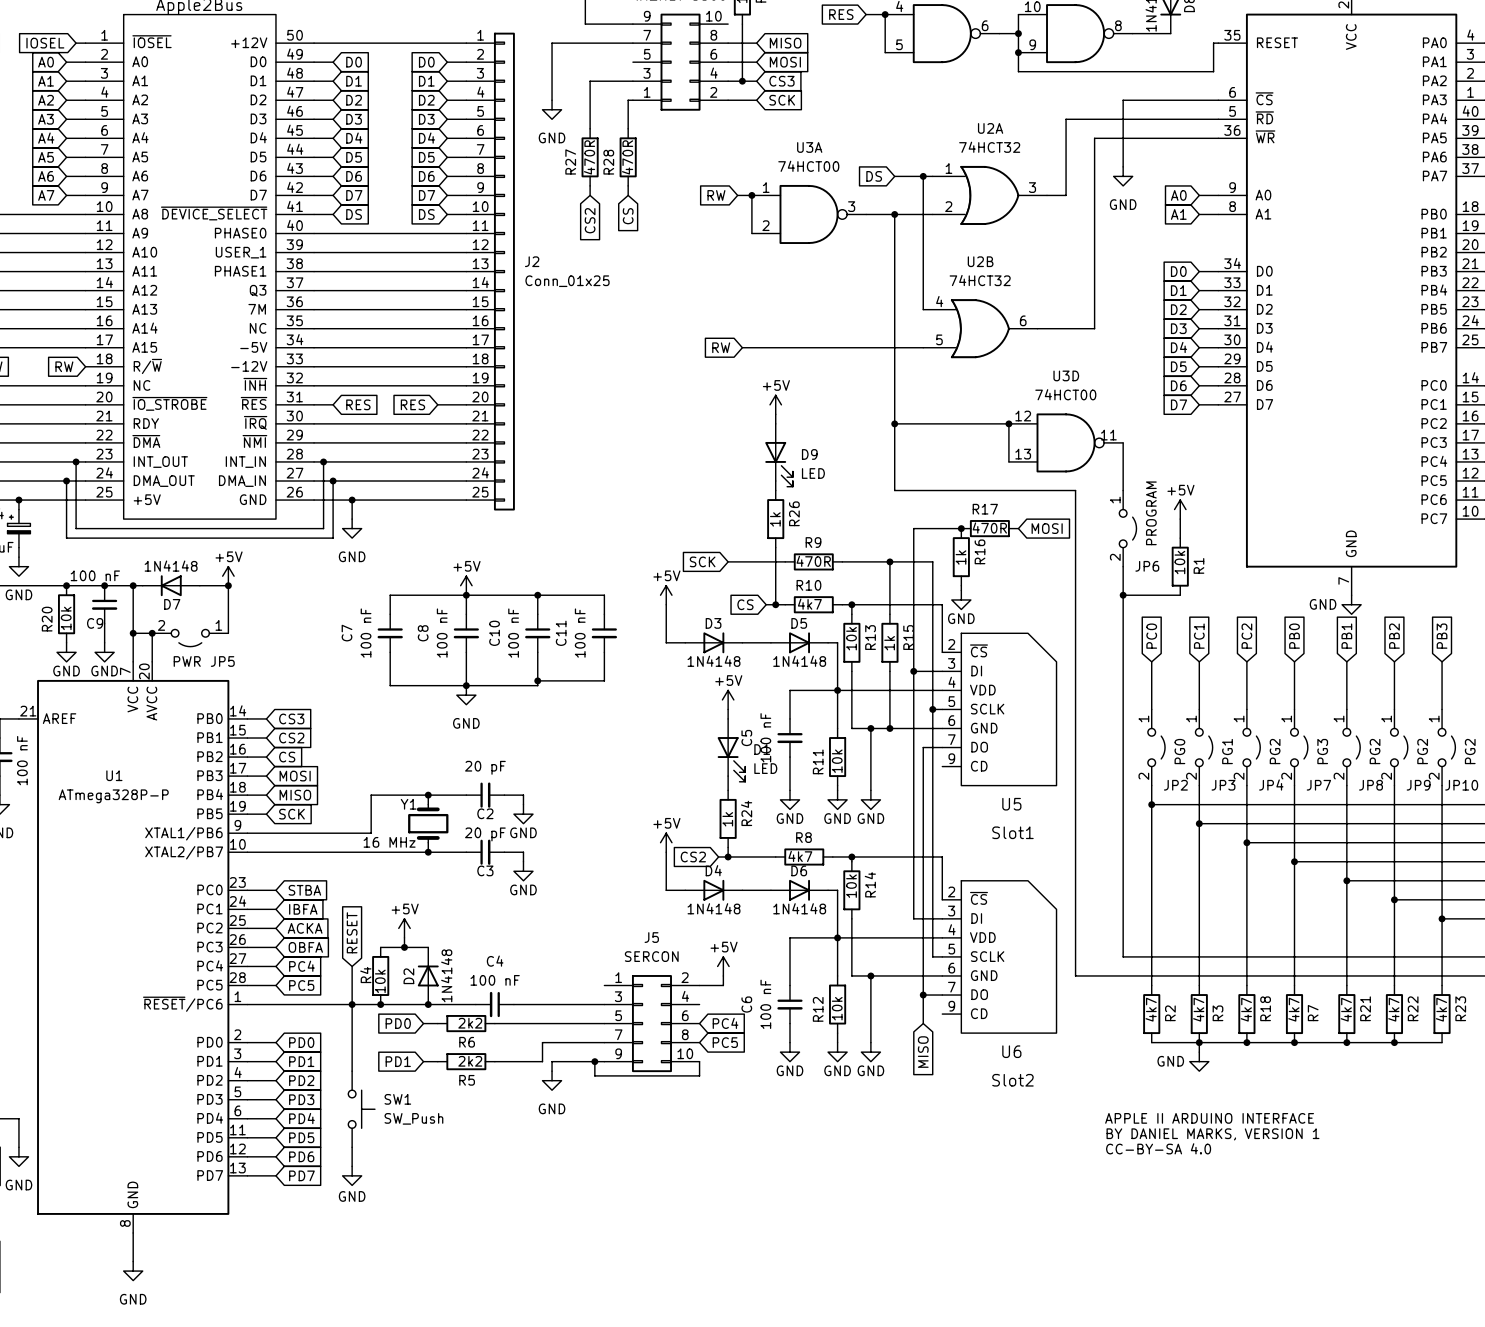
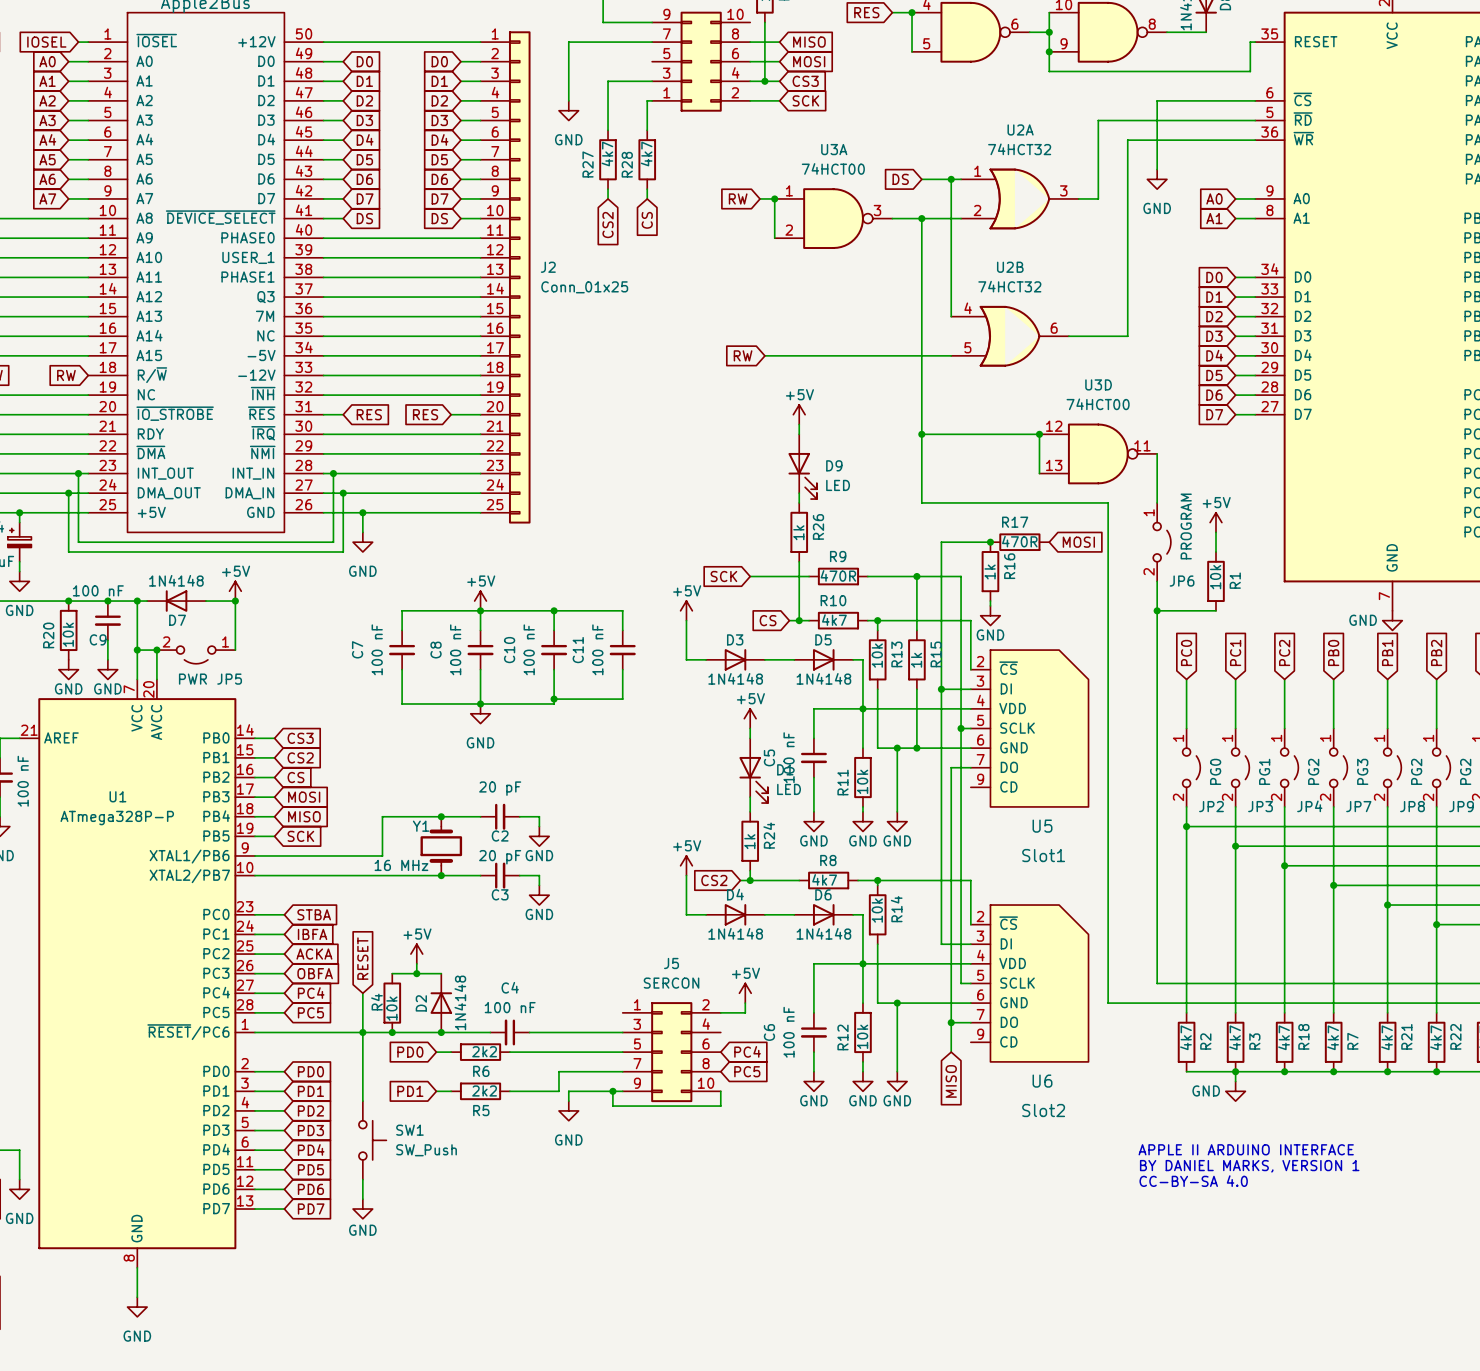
R27 value: 470R (589, 157) -> 4k7 (607, 153)
R28 value: 470R (627, 157) -> 4k7 (646, 153)

